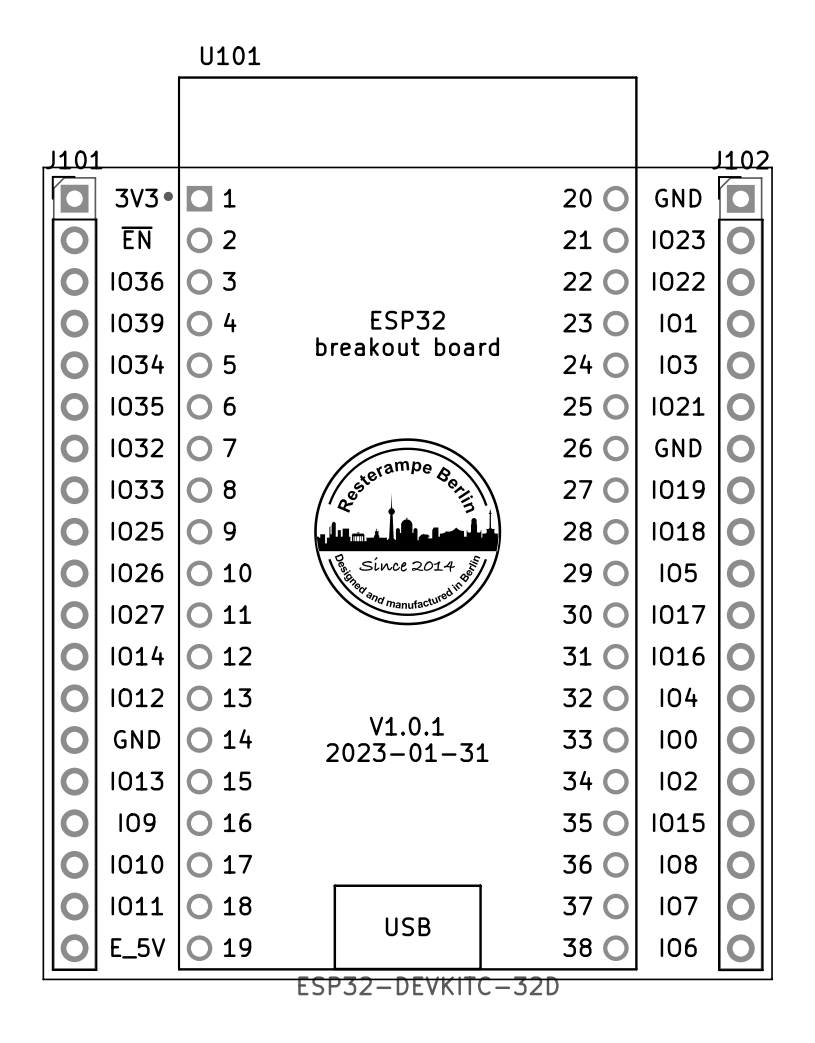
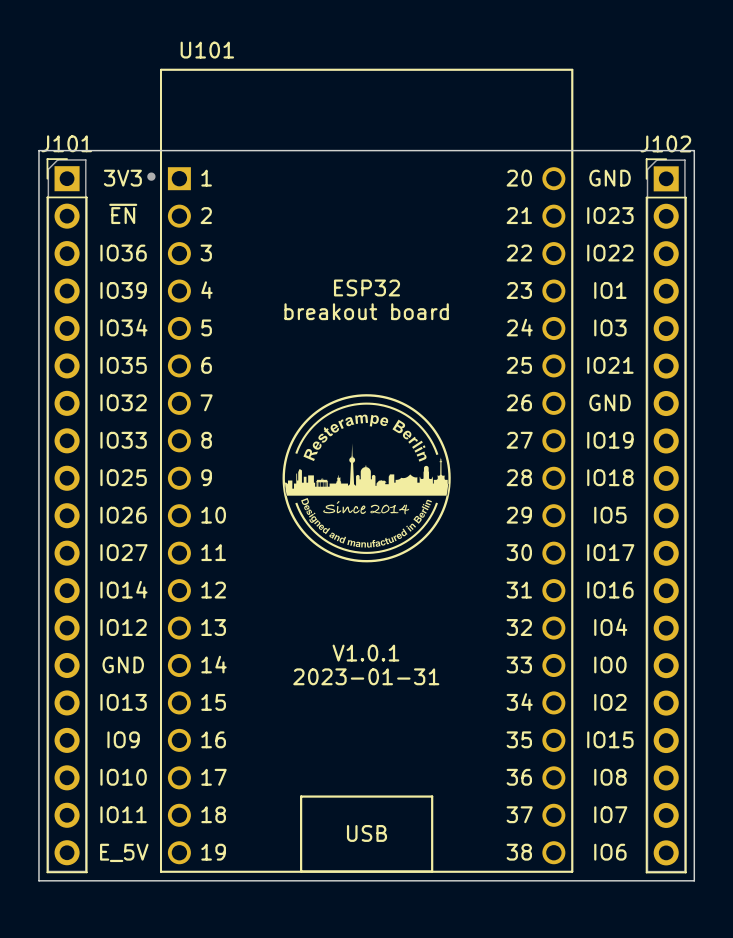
U101 value: ESP32-DEVKITC-32D (428, 985) -> none

